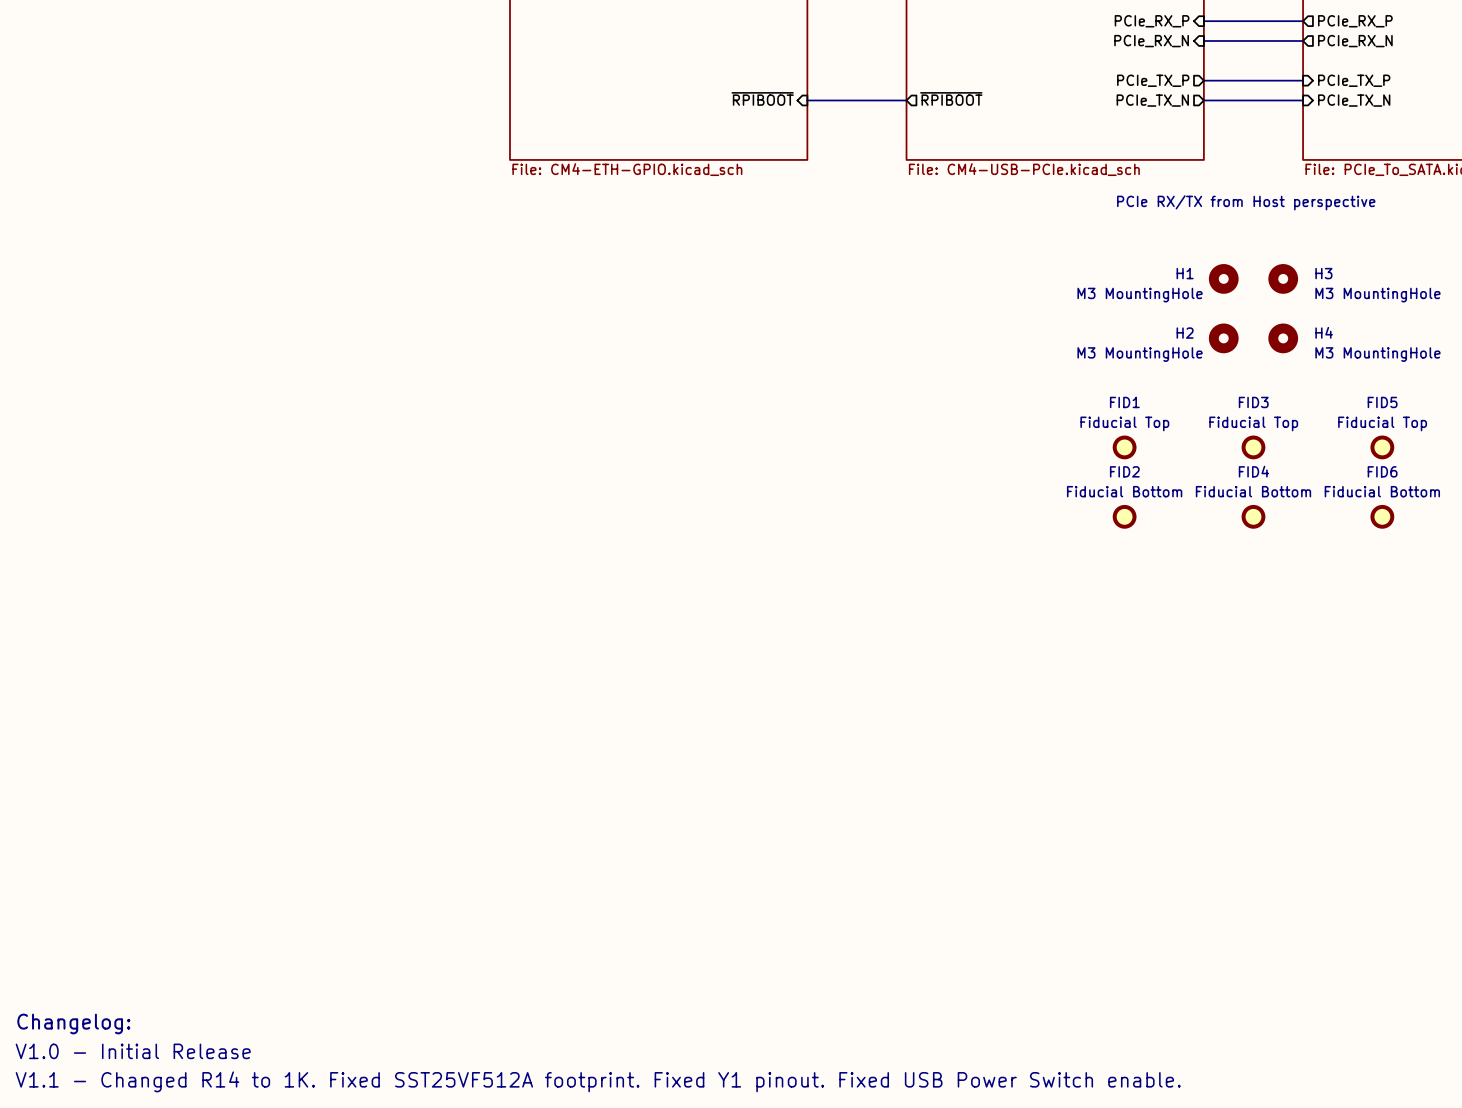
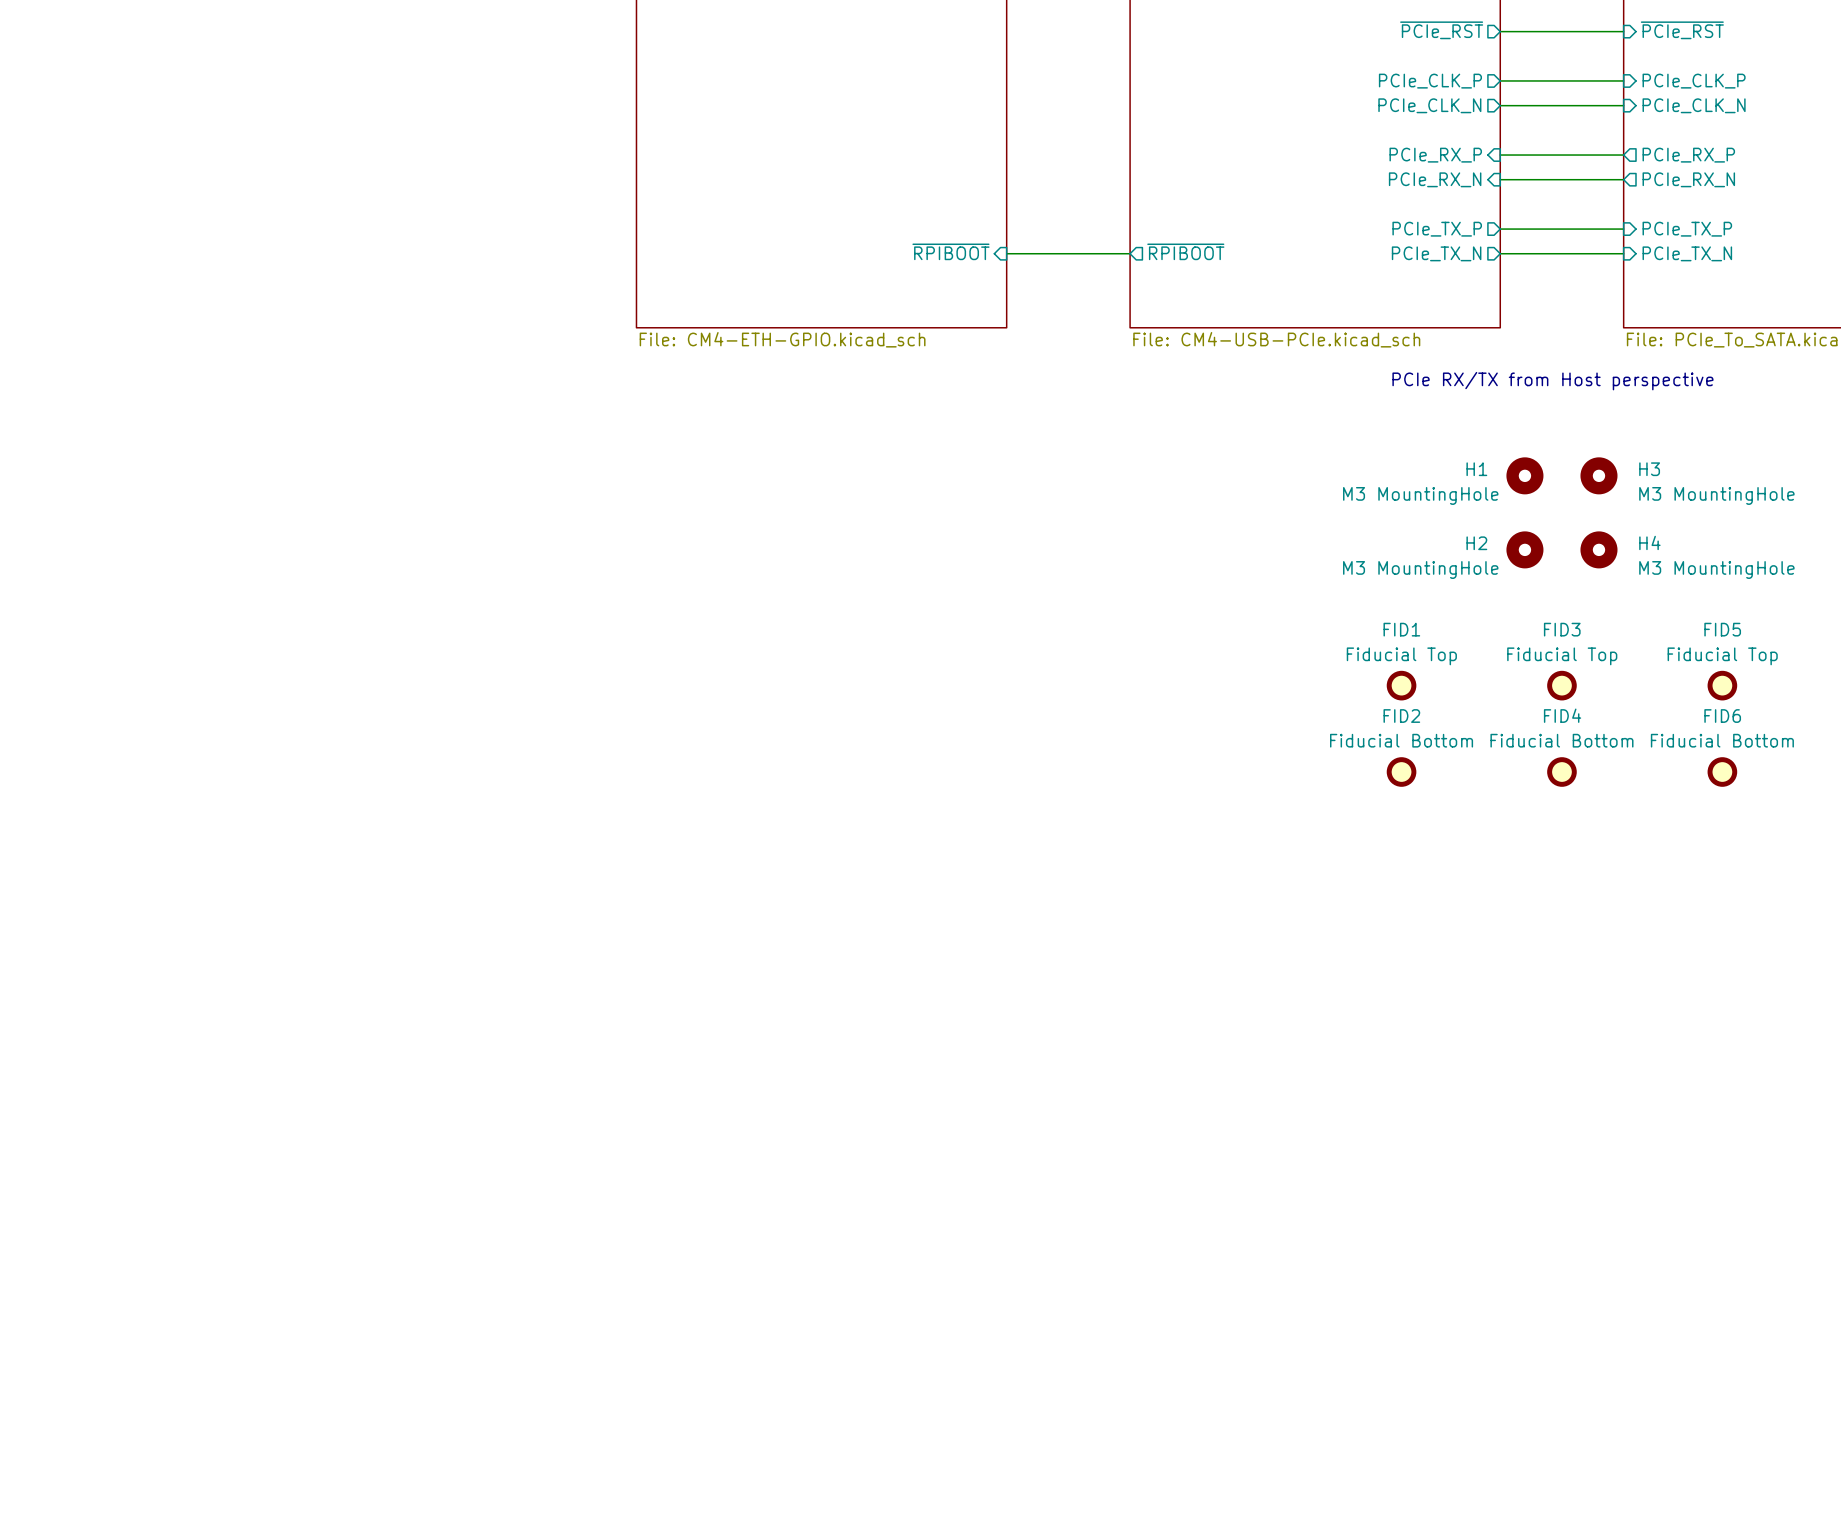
text: Changelog: (73, 1023) -> none
text: V1.0 - Initial Release (133, 1051) -> none
text: V1.1 - Changed R14 to 1K. Fixed SST25VF512A footprint. Fixed Y1 pinout. Fixed USB Power Switch enable. (598, 1081) -> none

